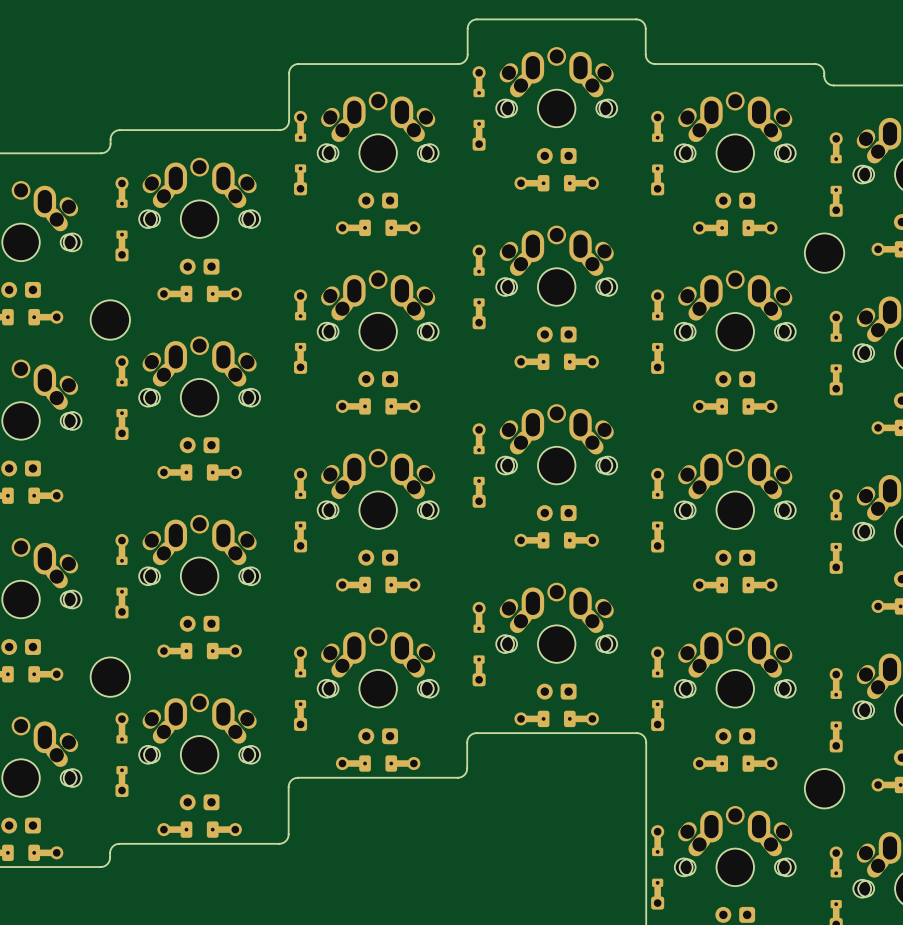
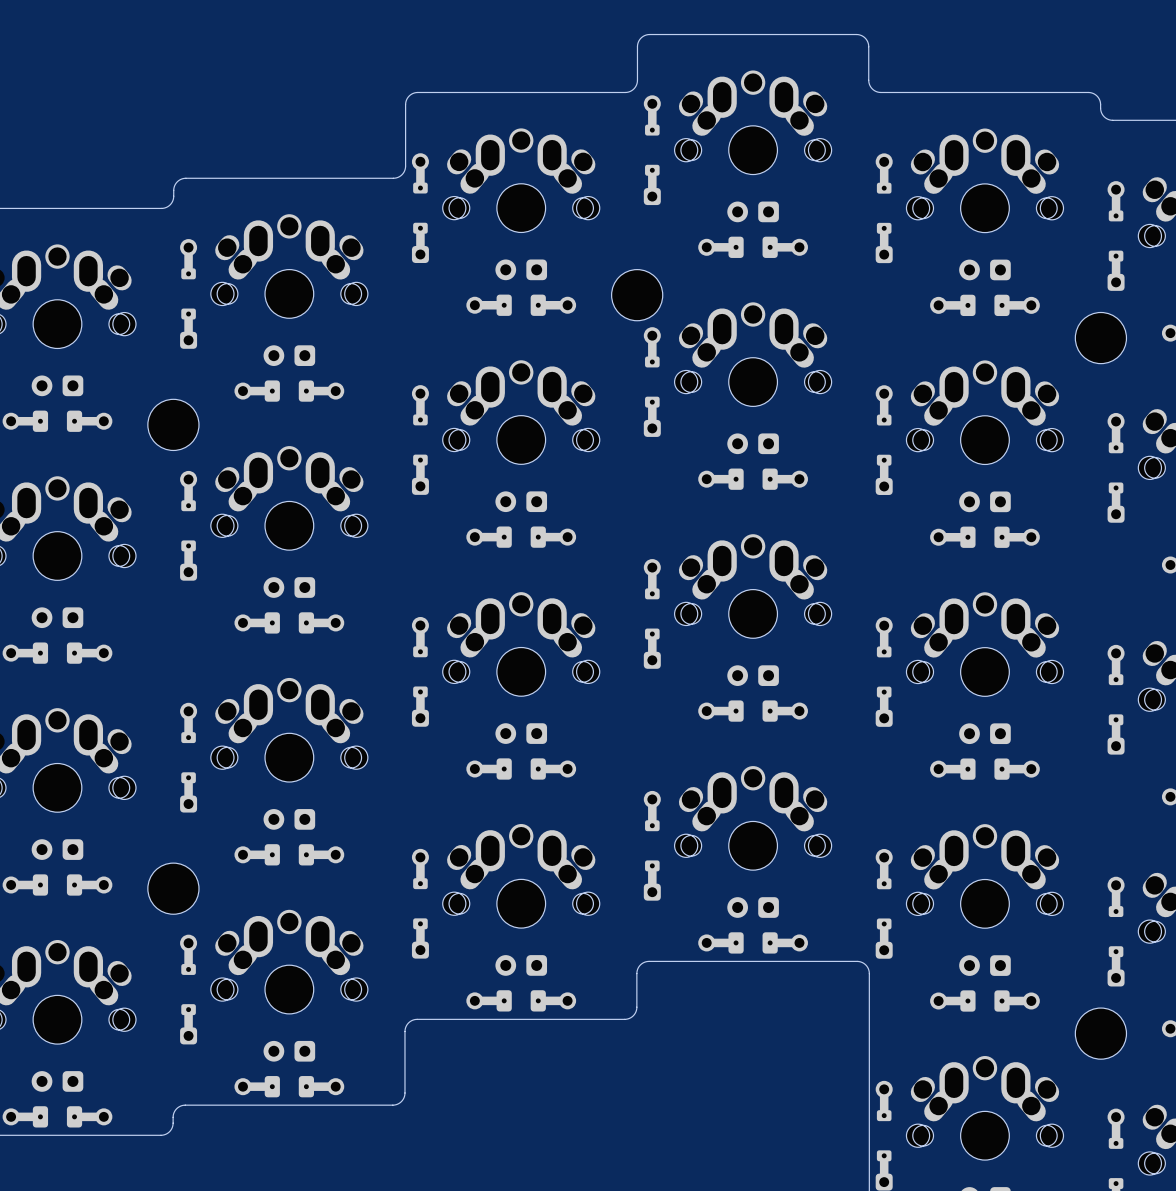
part: none -> (637, 295)

